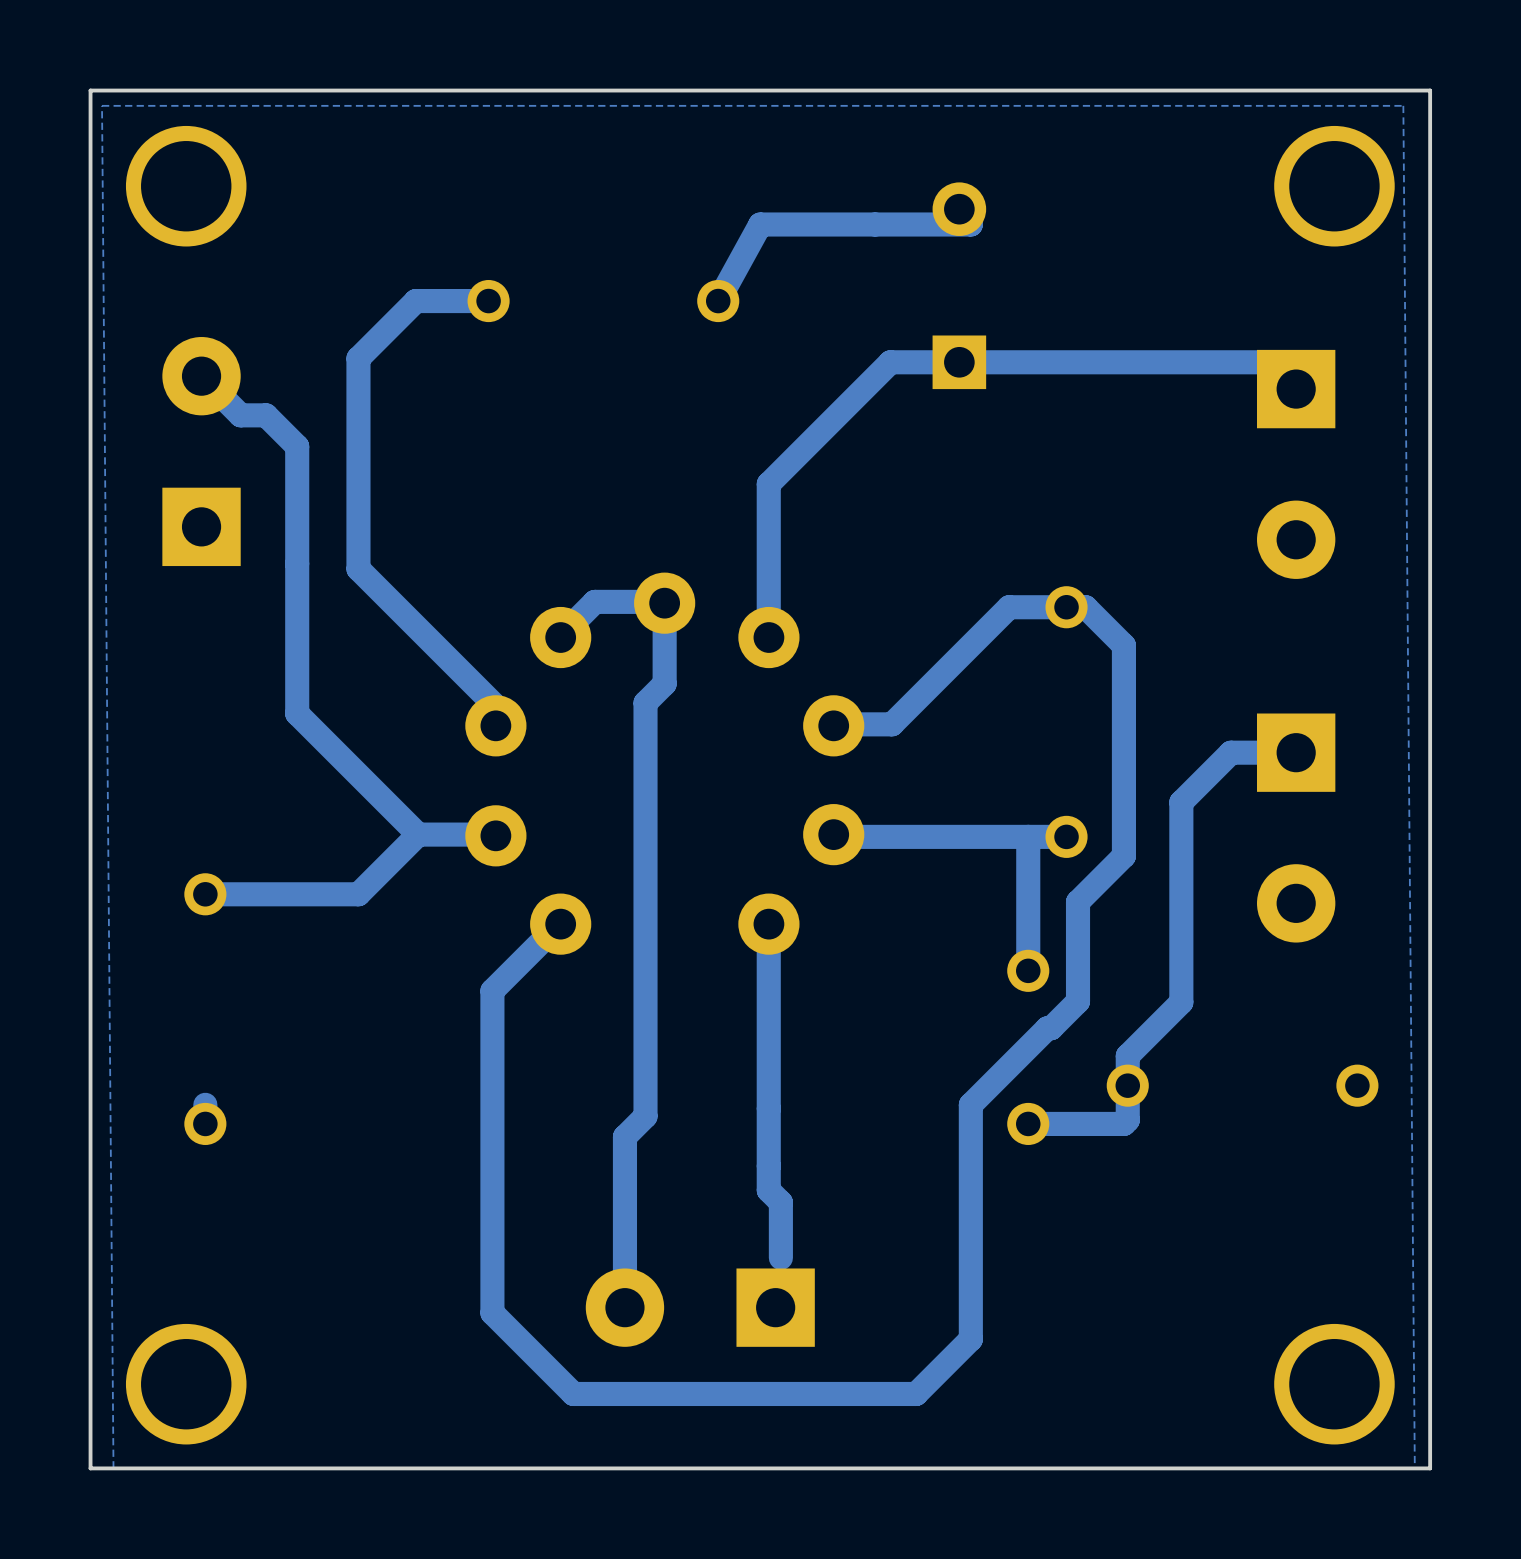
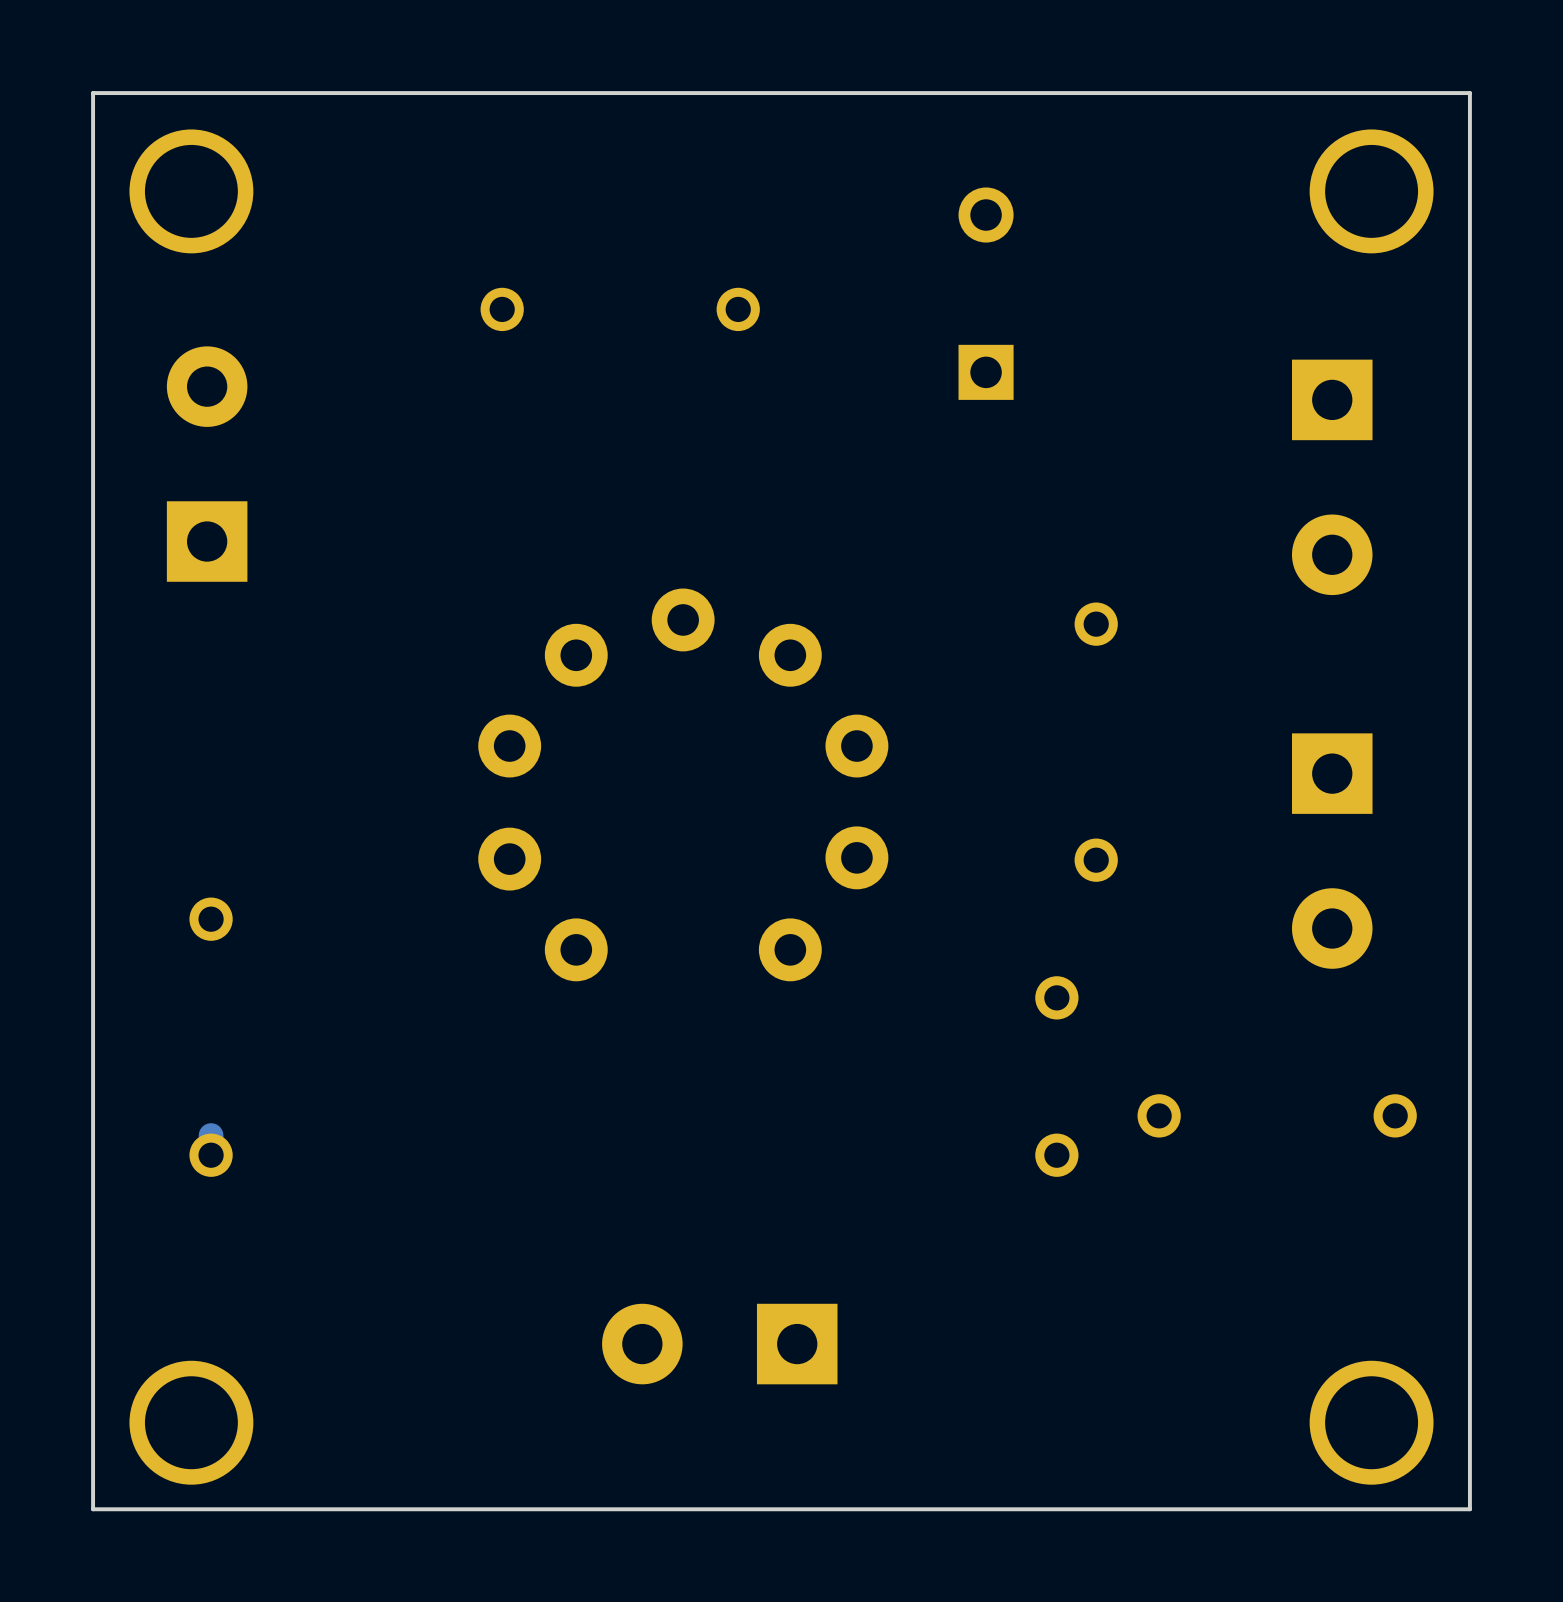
bottom zone outline: (1403, 105) (102, 105) (113, 1468) (1414, 1468) (1403, 105) -> none
bottom track: (959, 209) (970, 224) (760, 224) (718, 301) -> none
bottom track: (488, 301) (415, 301) (358, 358) (358, 568) (495, 706) (495, 724) -> none
bottom track: (201, 376) (240, 415) (266, 415) (297, 446) (297, 713) (418, 834) -> none
bottom track: (1296, 389) (1269, 362) (890, 362) (768, 484) (768, 636) -> none
bottom track: (560, 636) (594, 601) (664, 601) (664, 683) (645, 702) (645, 1116) (624, 1136) (624, 1307) -> none
bottom track: (833, 724) (892, 724) (1009, 607) (1085, 607) (1123, 645) (1123, 856) (1078, 901) (1078, 1001) (1051, 1028) (1047, 1028) (970, 1104) (970, 1339) (916, 1393) (573, 1393) (492, 1312) (492, 990) (560, 922) -> none
bottom track: (1296, 752) (1230, 752) (1181, 802) (1181, 1002) (1127, 1055) (1127, 1120) (1123, 1123) (1028, 1123) -> none
bottom track: (833, 833) (837, 836) (1066, 836) -> none
bottom track: (418, 834) (358, 894) (205, 894) -> none
bottom track: (495, 834) (418, 834) -> none
bottom track: (1028, 836) (1028, 970) -> none
bottom track: (768, 922) (768, 1190) (780, 1202) (780, 1257) -> none

